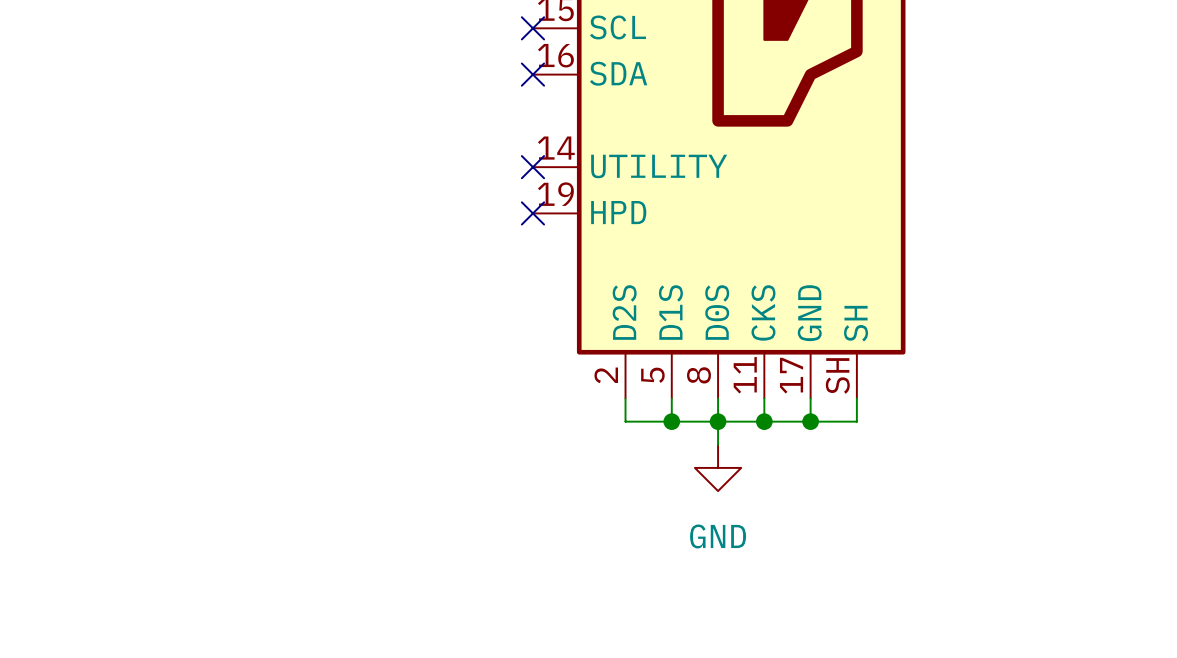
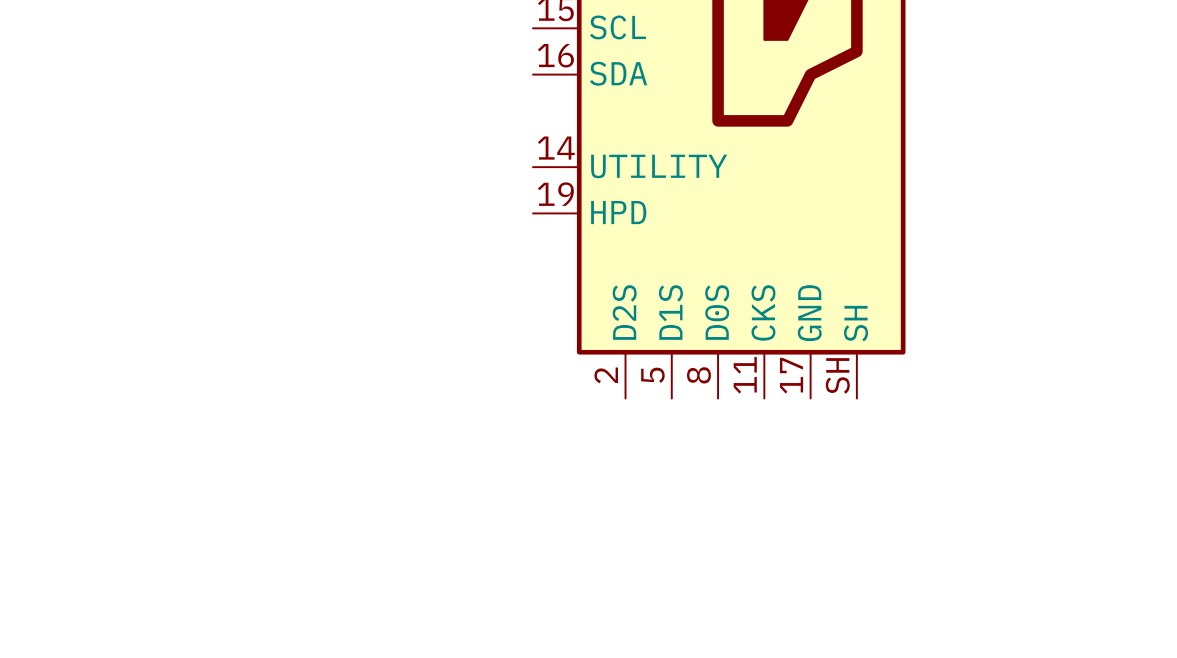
no-connect mark: (532, 28) -> none
no-connect mark: (532, 74) -> none
no-connect mark: (532, 167) -> none
no-connect mark: (532, 213) -> none
wire: (625, 398) (625, 421) (856, 421) (856, 398) -> none
wire: (671, 398) (671, 421) -> none
wire: (718, 398) (718, 444) -> none
wire: (764, 398) (764, 421) -> none
wire: (810, 398) (810, 421) -> none
junction: (671, 421) -> none
junction: (718, 421) -> none
junction: (764, 421) -> none
junction: (810, 421) -> none
power symbol: GND (718, 467) -> none

